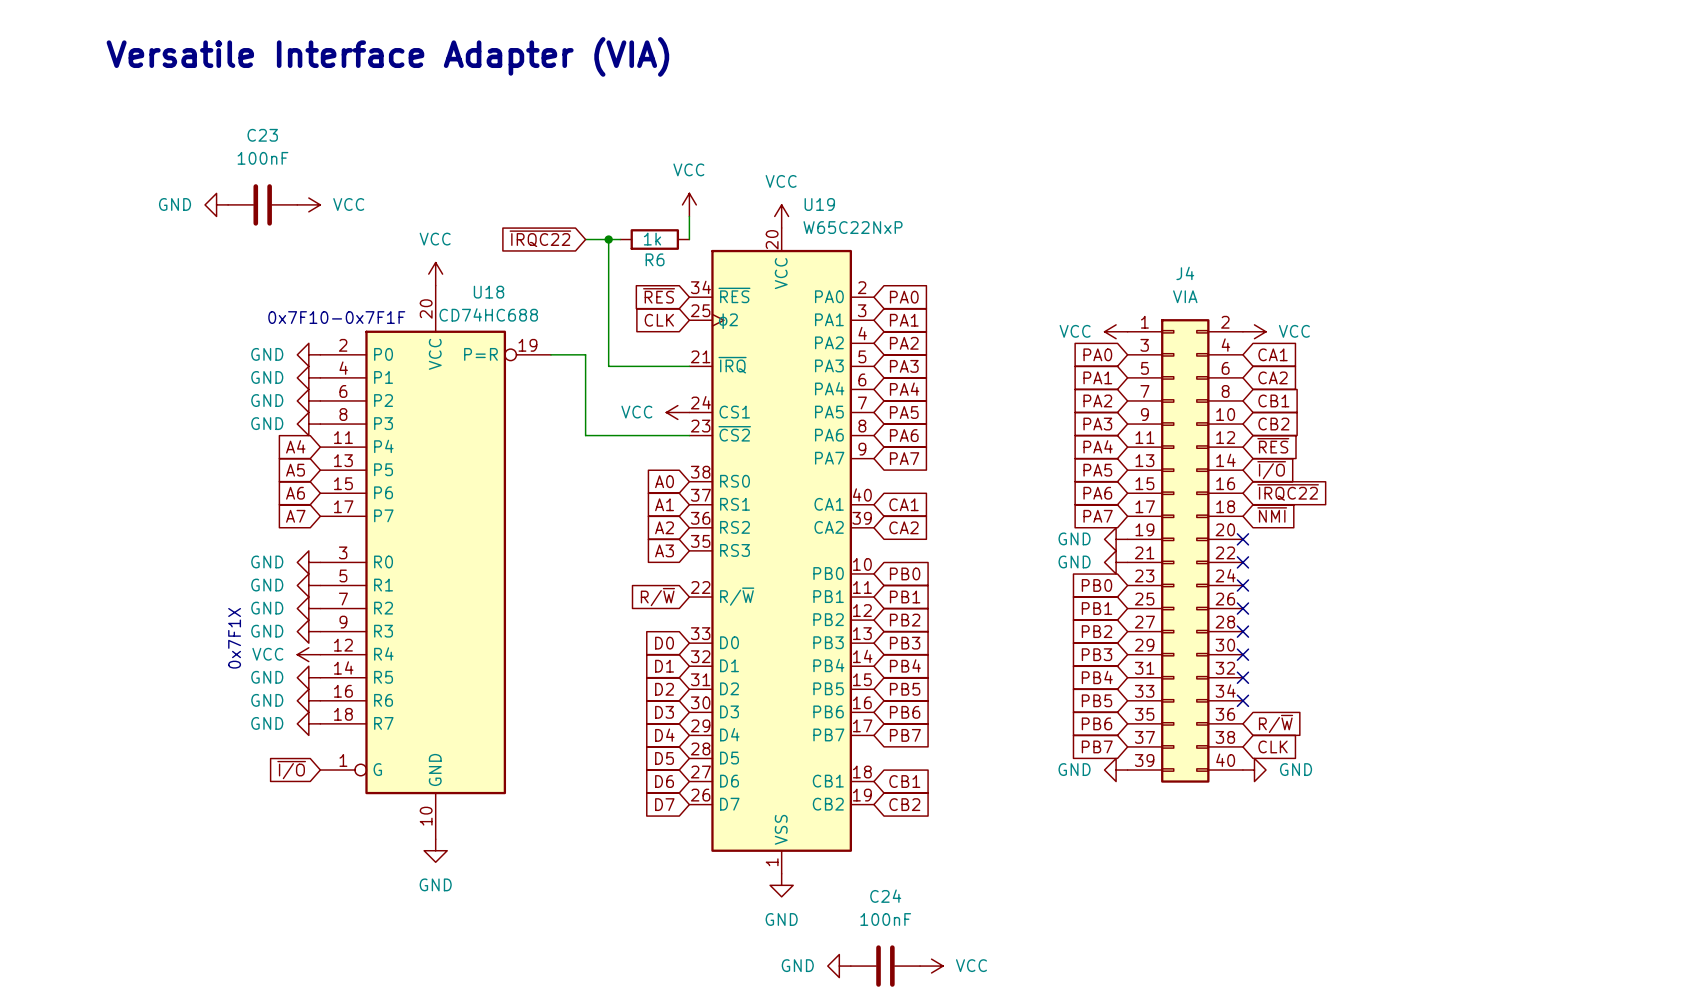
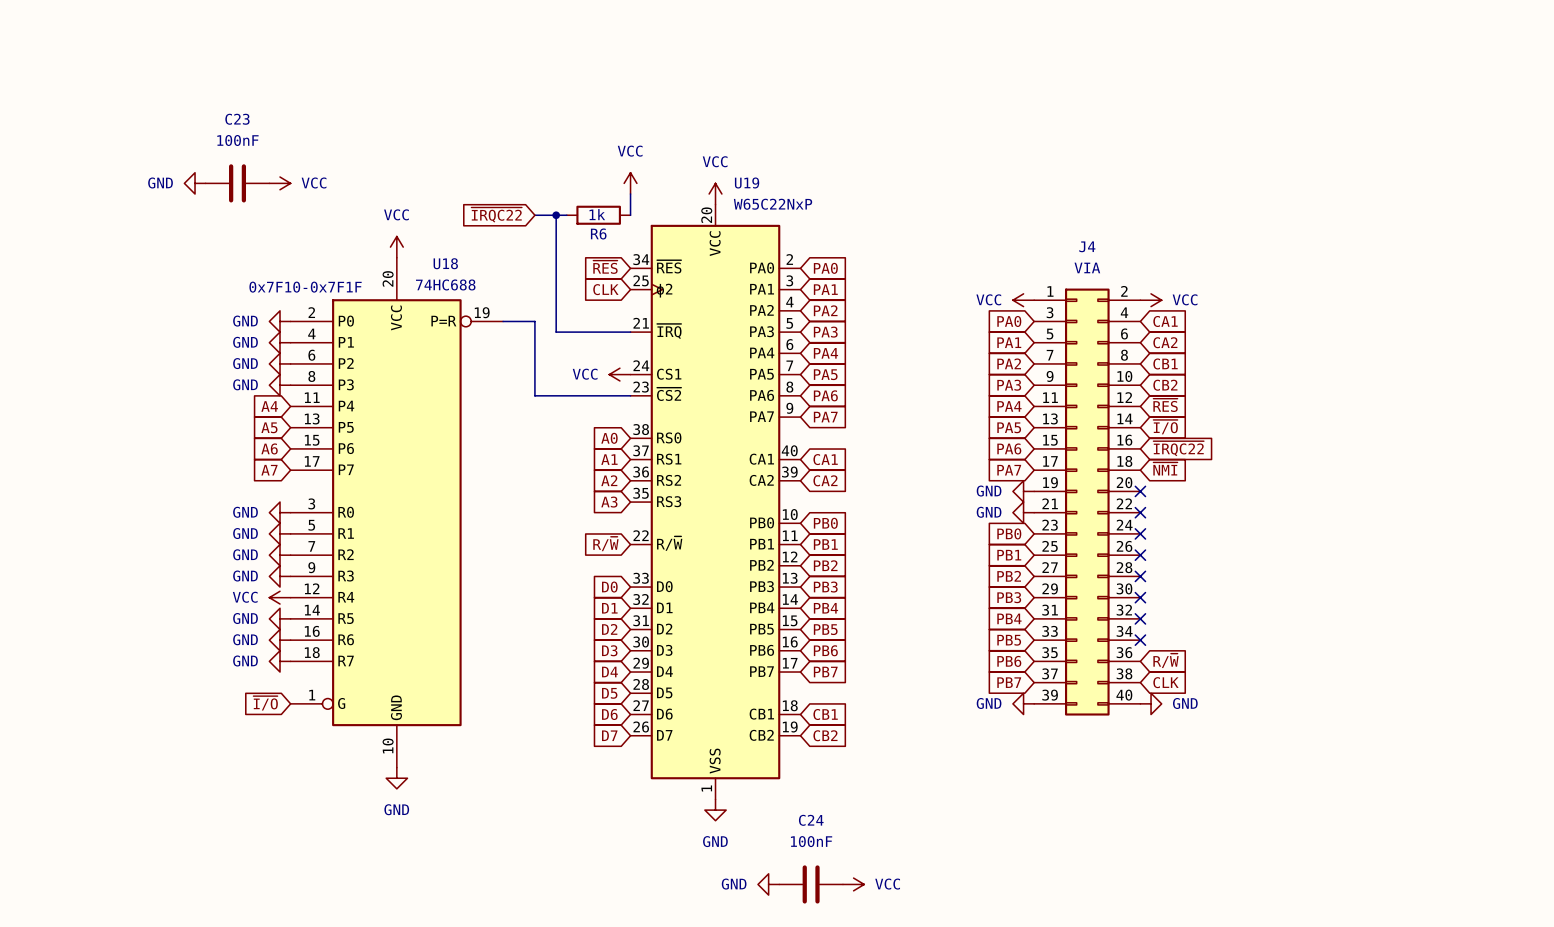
text: Versatile Interface Adapter (VIA) (387, 56) -> none
U18 value: CD74HC688 (488, 314) -> 74HC688 (445, 284)
text: 0x7F1X (234, 638) -> none

